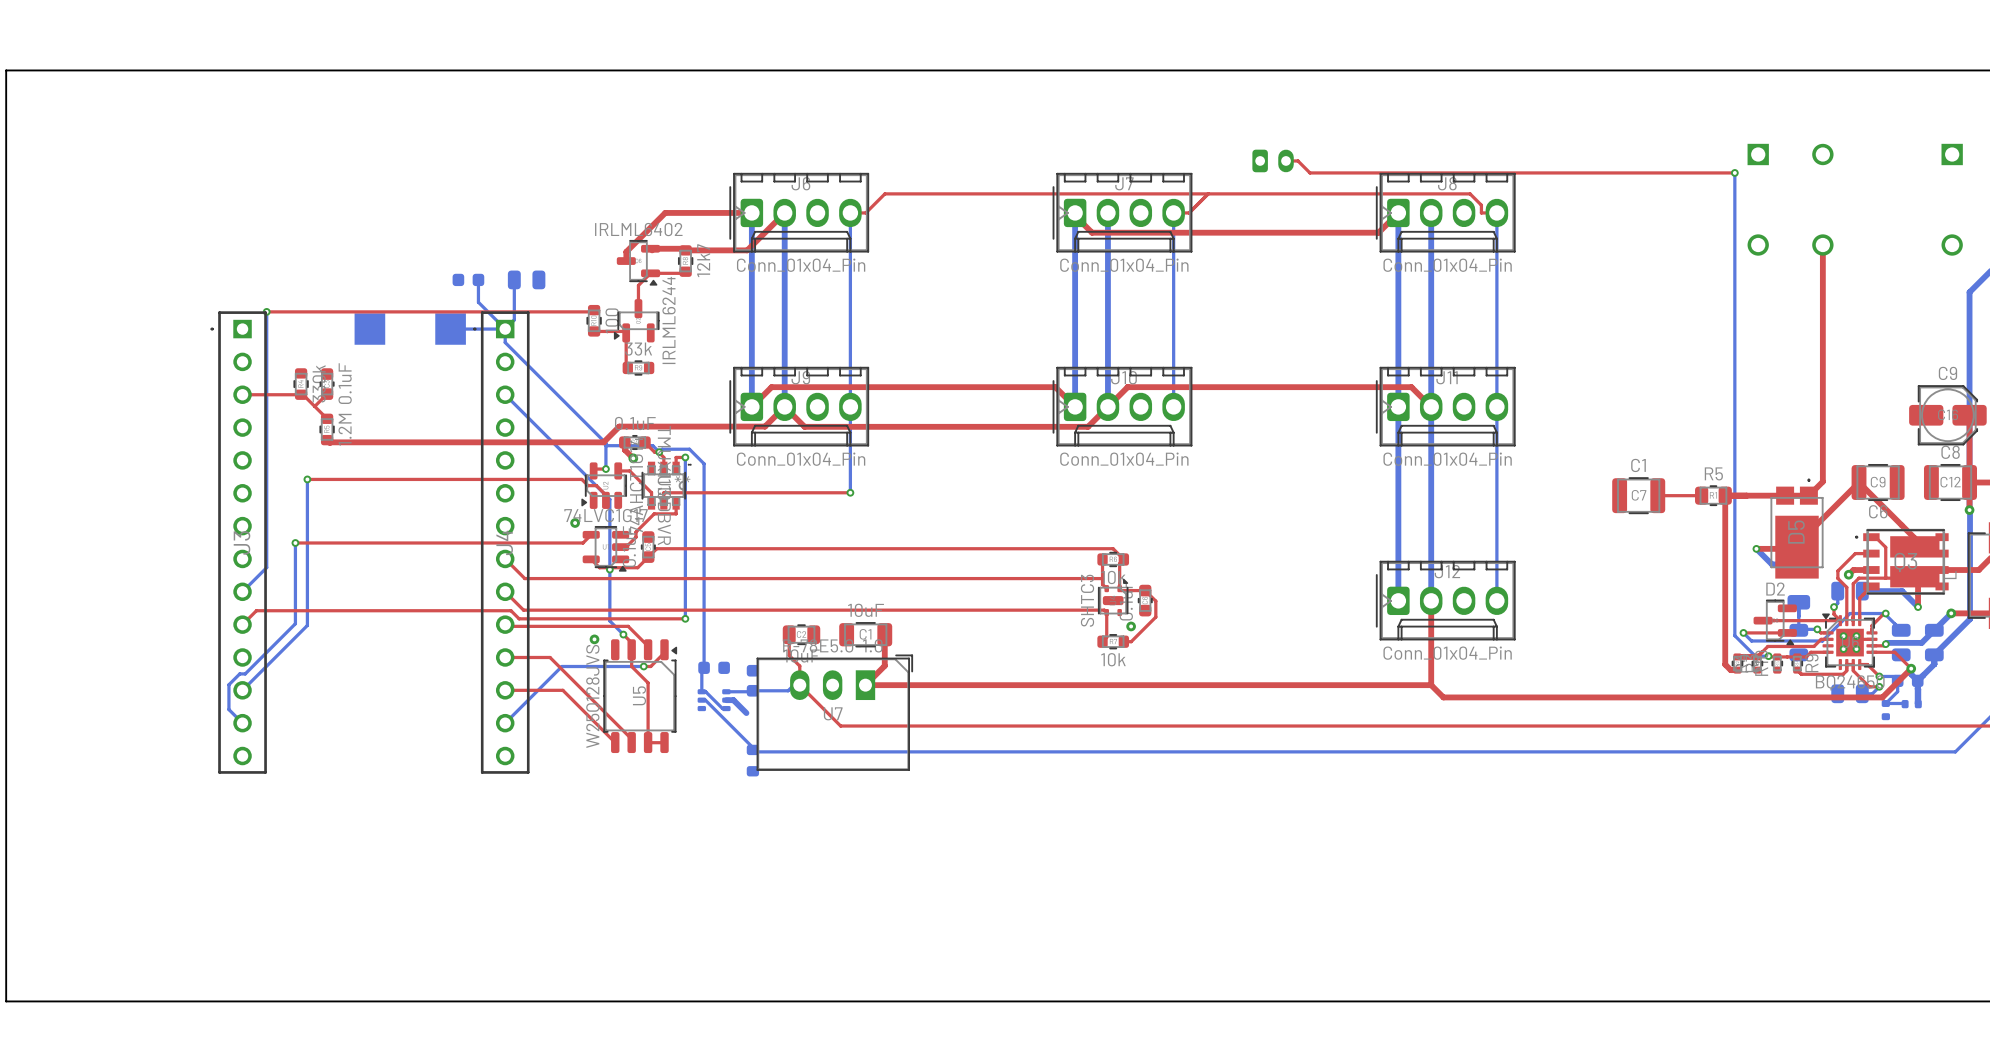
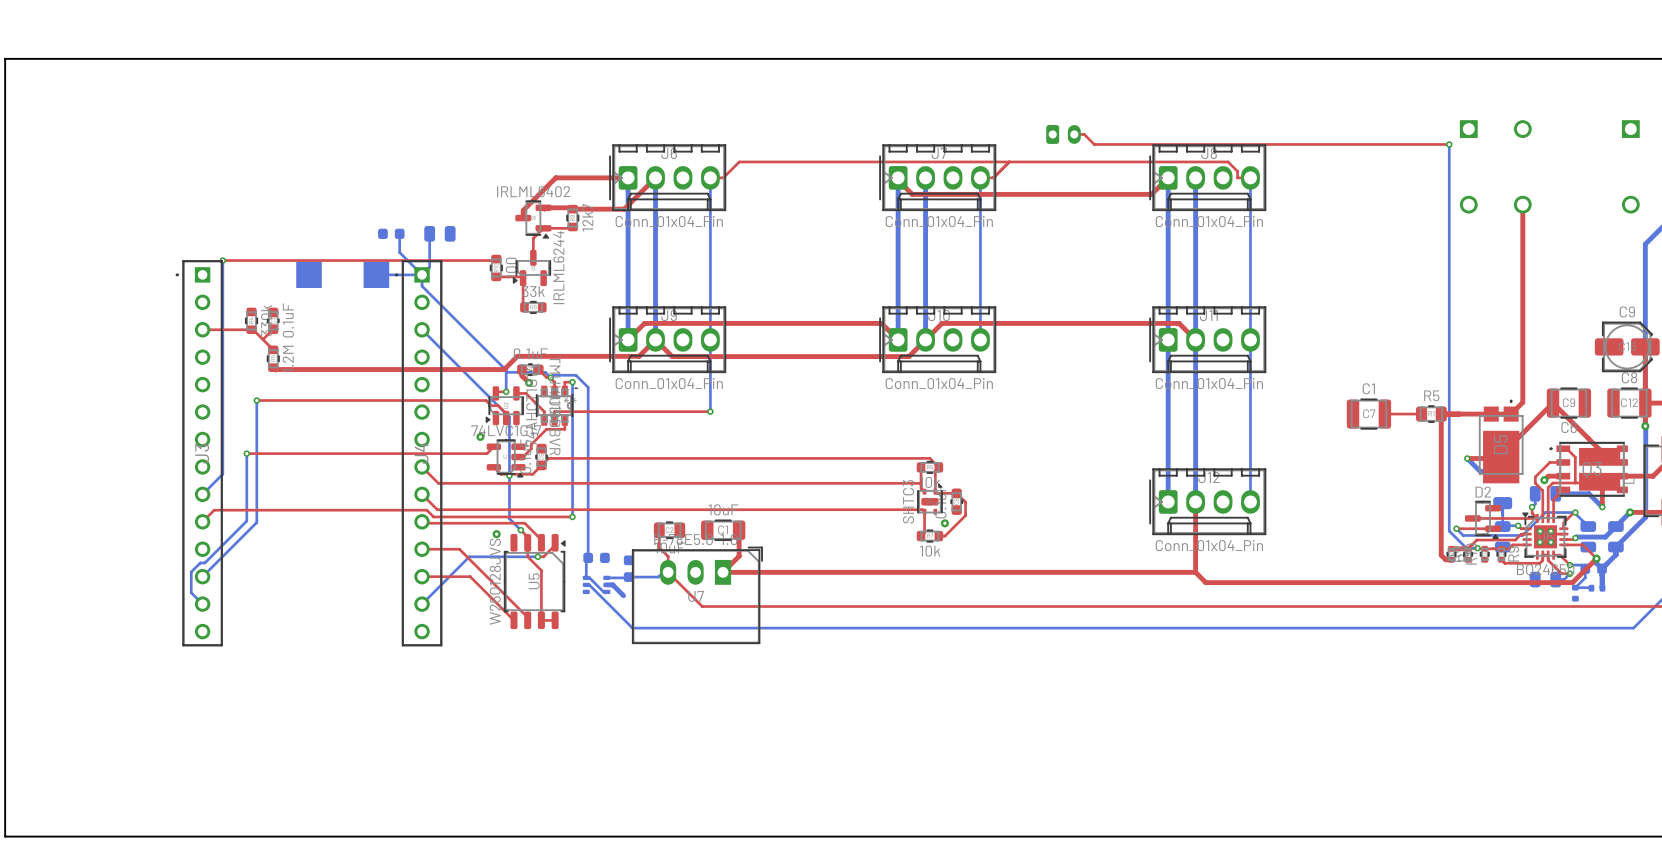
part: (752, 760) -> none

